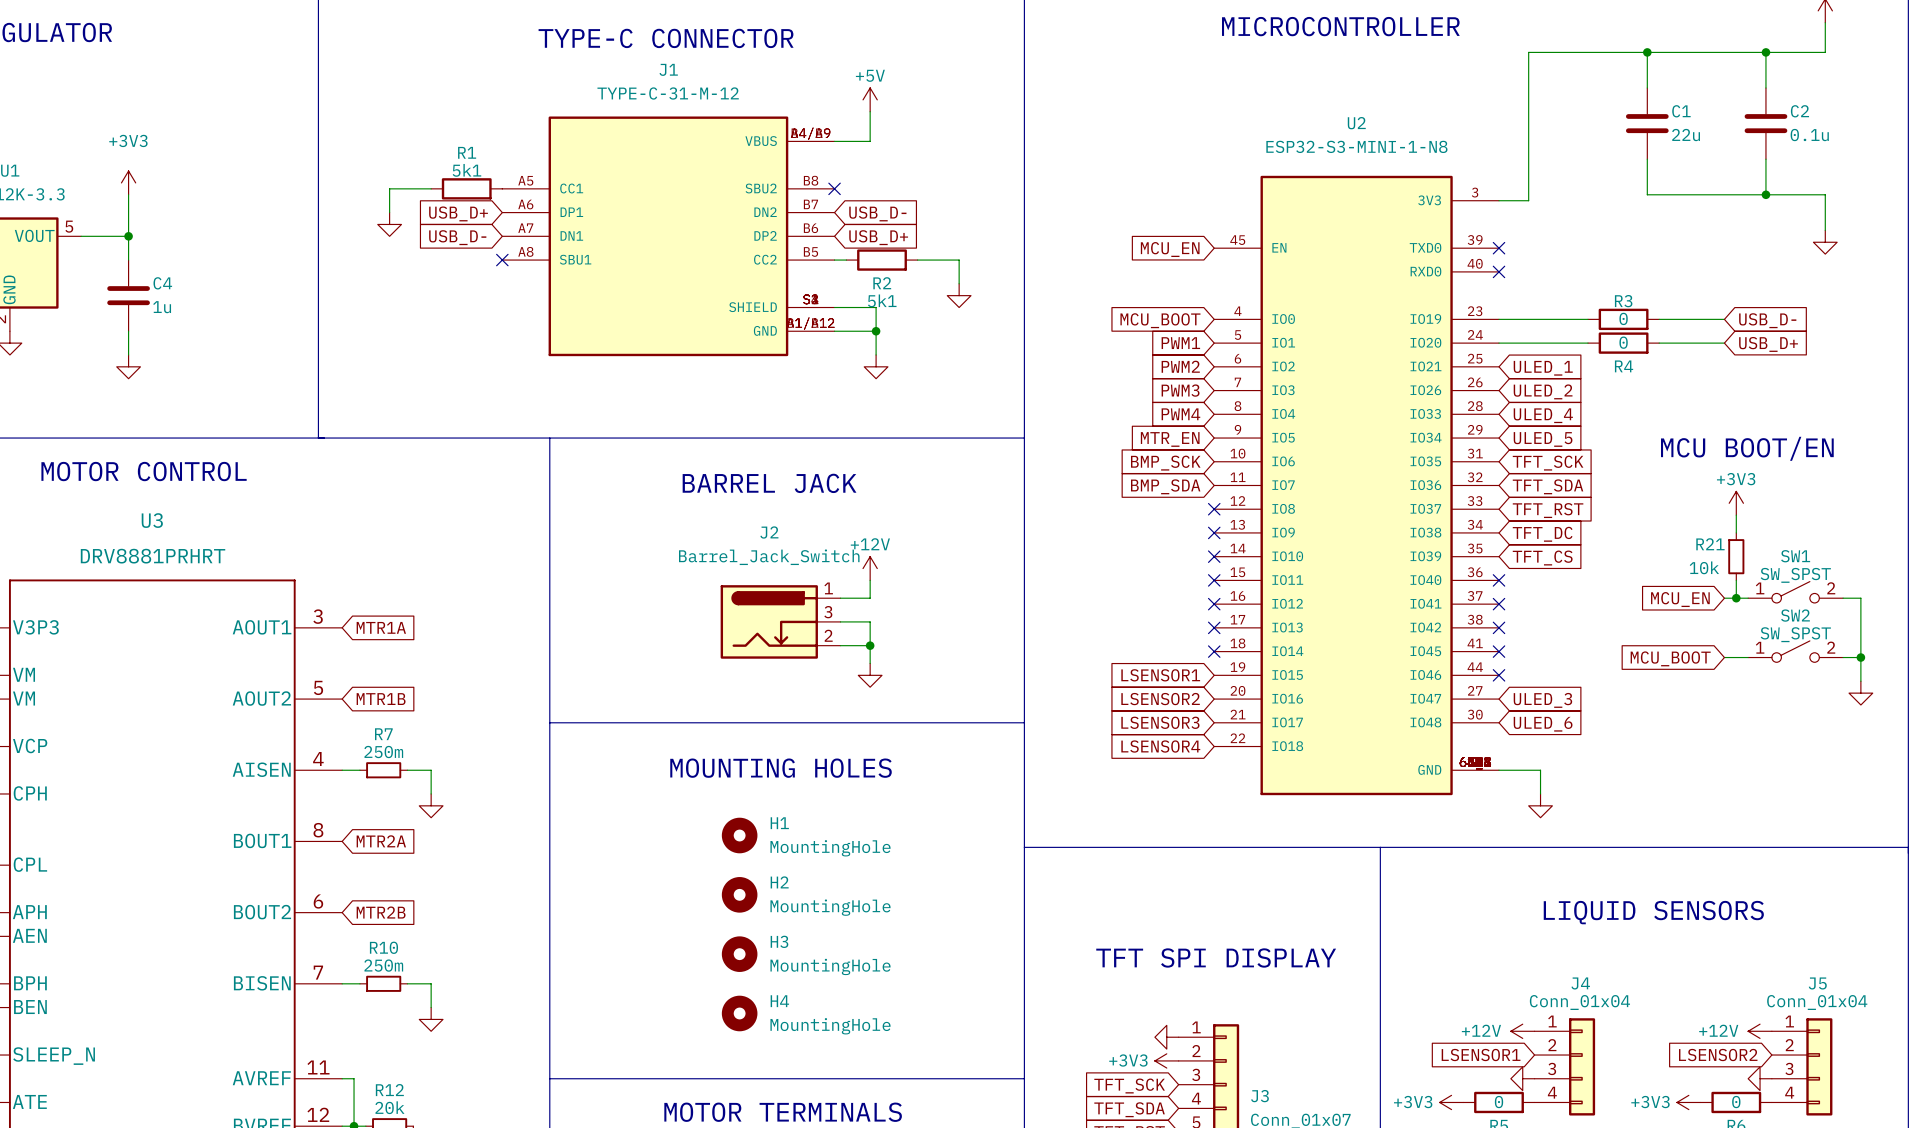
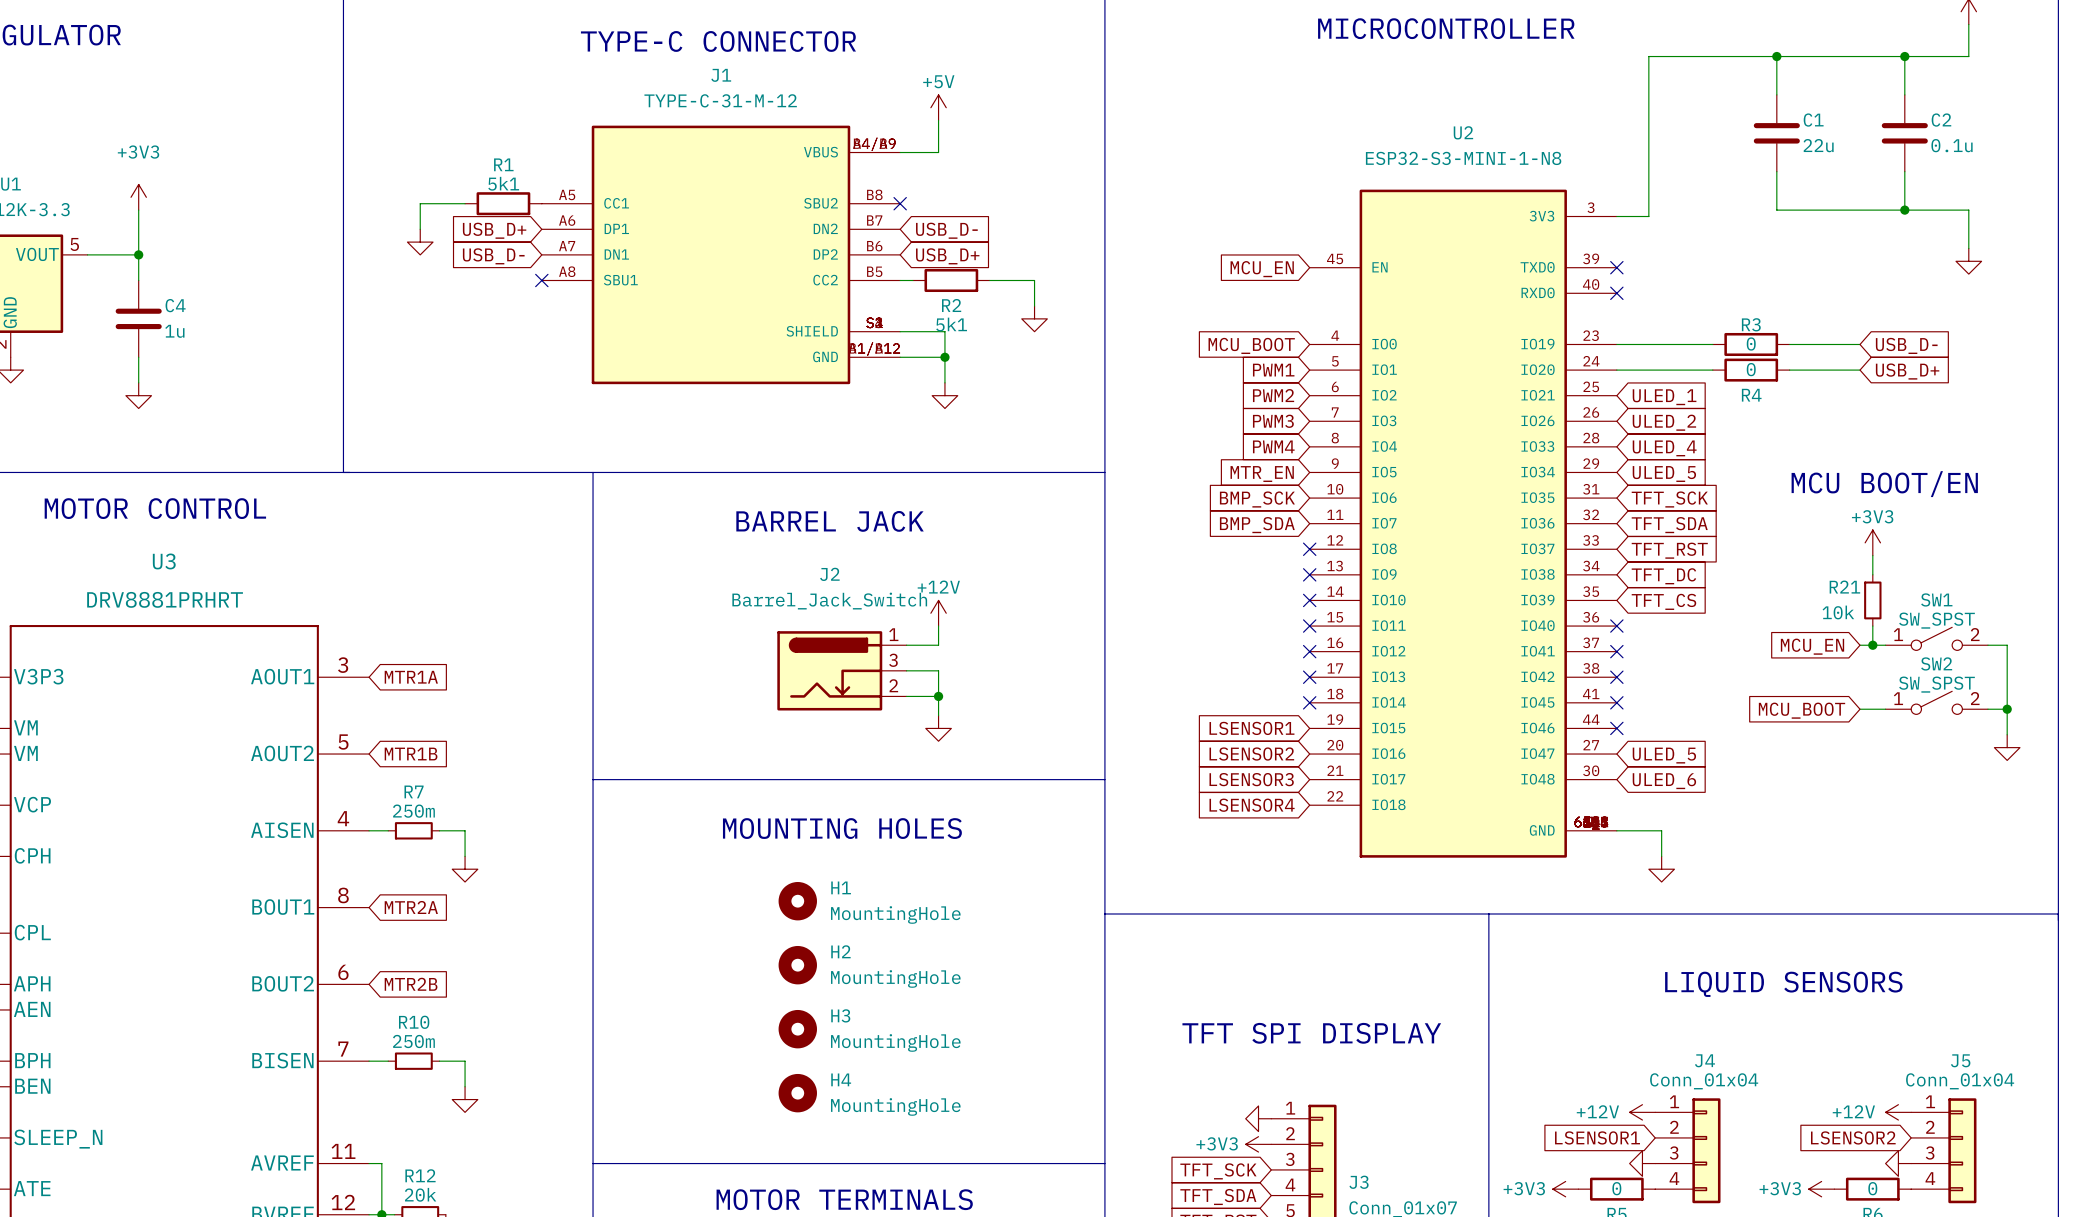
global label: ULED_3 (1542, 700) -> ULED_5 (1664, 755)

